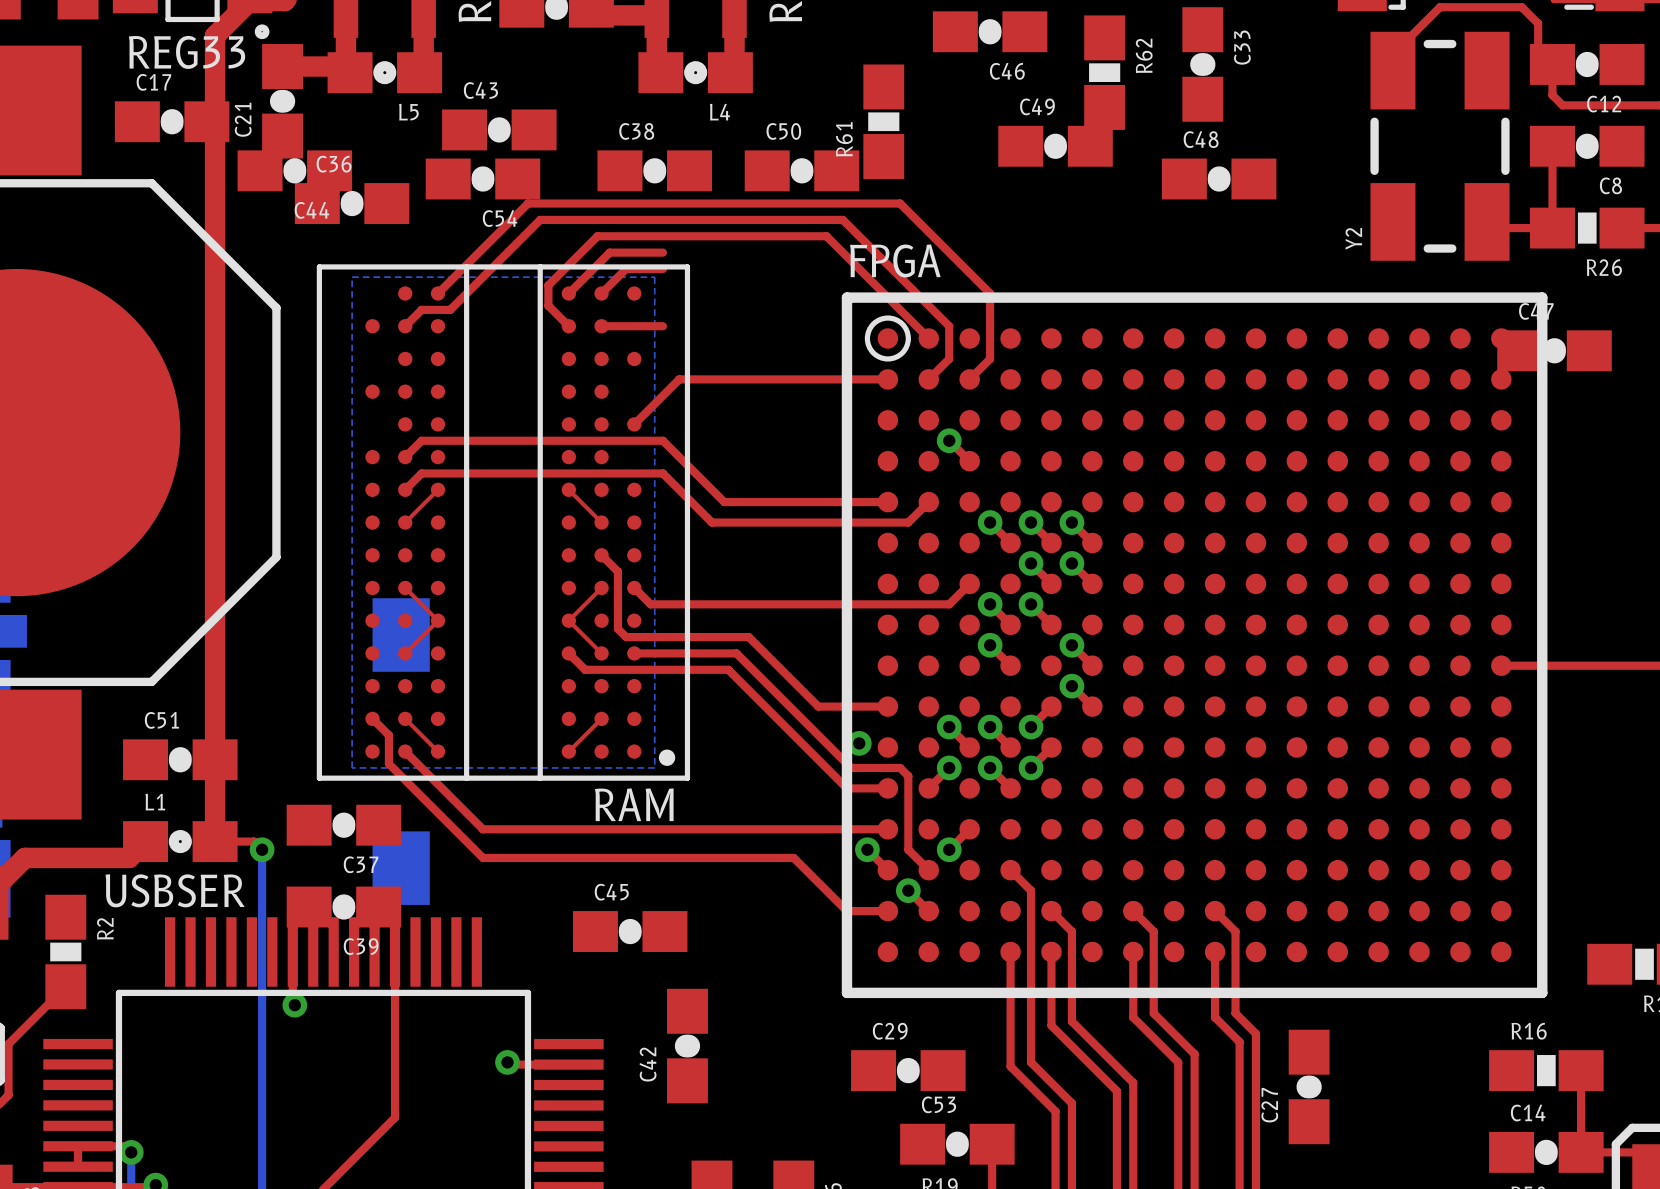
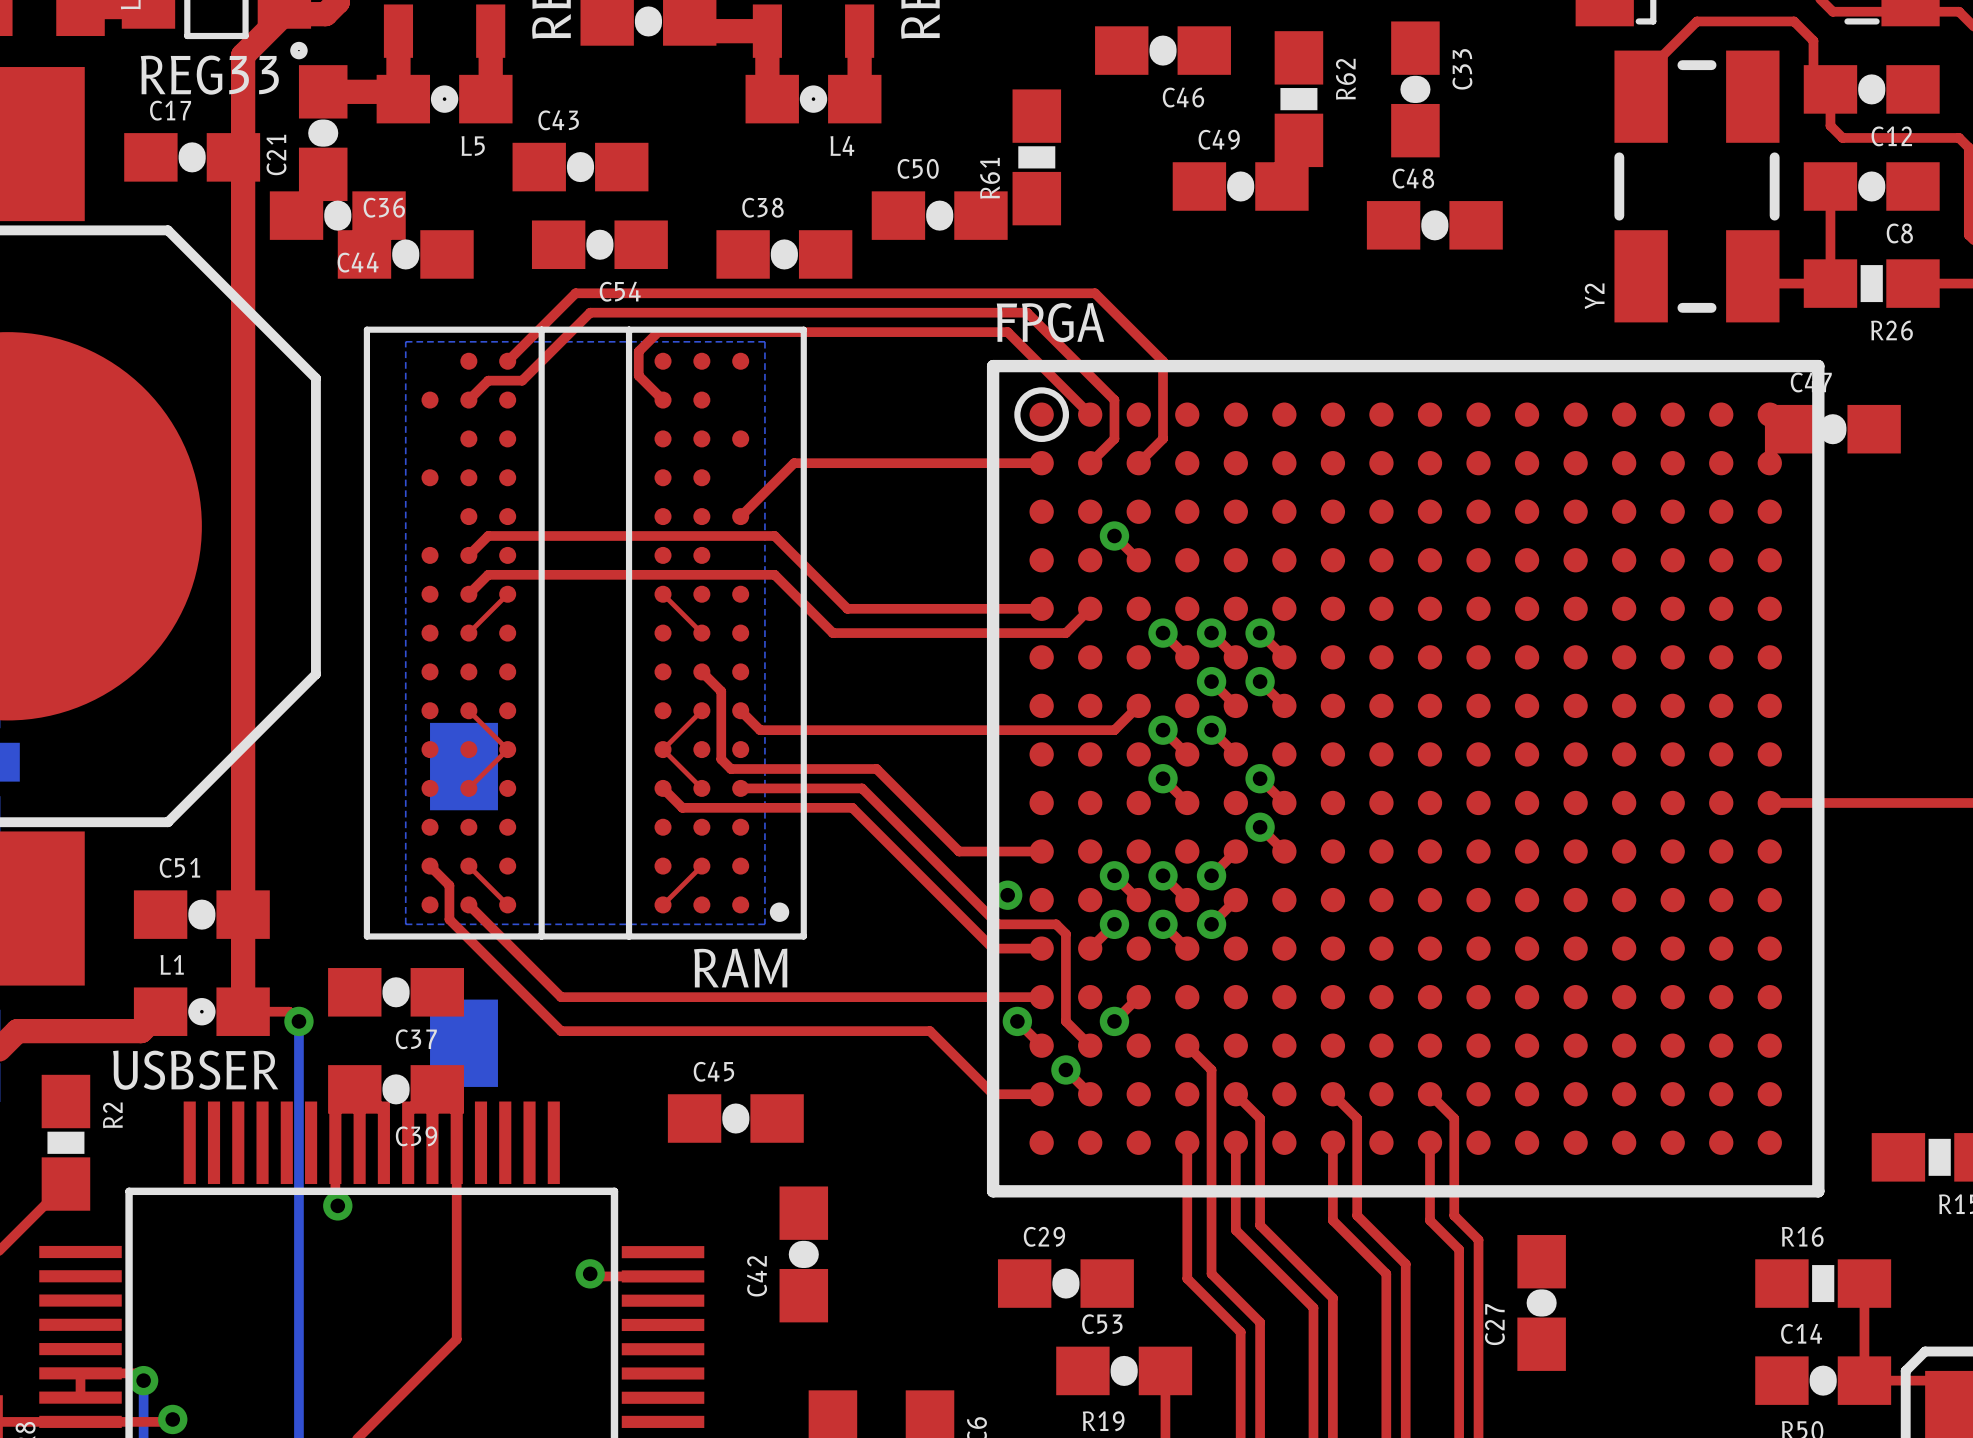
C38 position: (654, 170) -> (784, 254)
C54 position: (482, 179) -> (599, 244)
top track: (495, 236) (527, 203) (900, 203) (932, 236) -> (575, 293) (697, 293)
top track: (597, 236) (564, 268) -> (730, 332) (658, 332)
top track: (826, 236) (859, 268) -> (968, 293) (1095, 293)
top track: (507, 252) (540, 219) (842, 219) (875, 252) -> (774, 312) (1027, 312)
top track: (609, 252) (568, 293) -> (711, 312) (590, 312)
top track: (626, 268) (601, 293) -> none
top track: none -> (774, 332) (1007, 332)
top track: (601, 326) (662, 326) -> none

